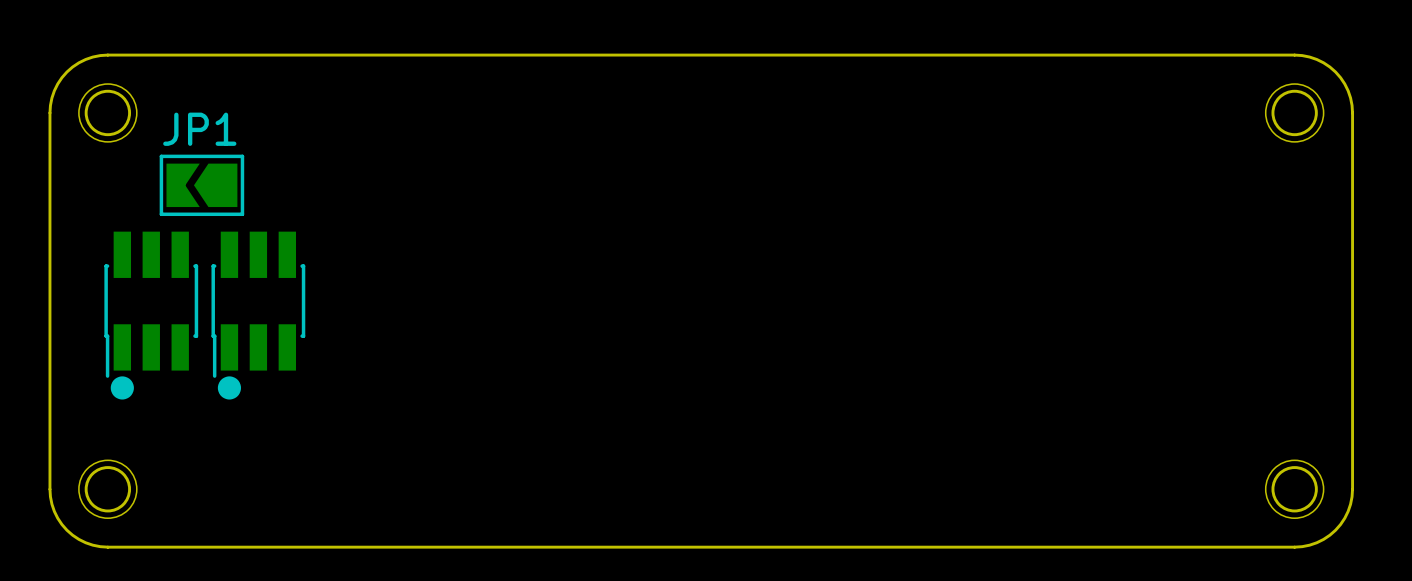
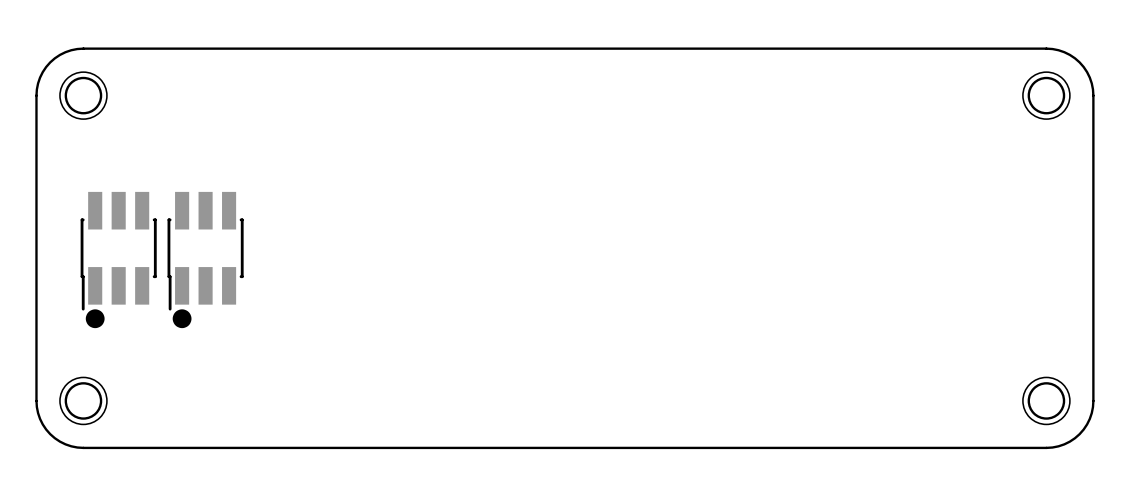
JP1: (201, 185) -> none

